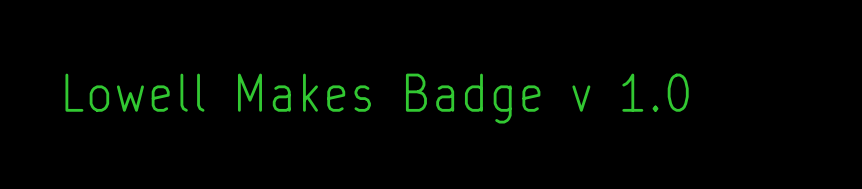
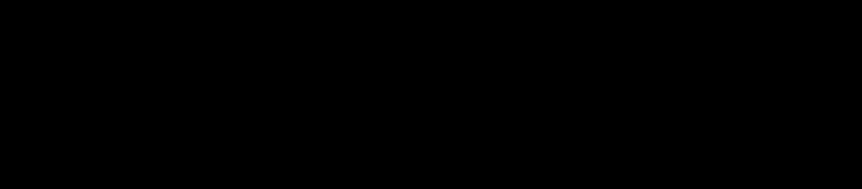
text: Lowell Makes Badge v 1.0 (377, 98) -> none

